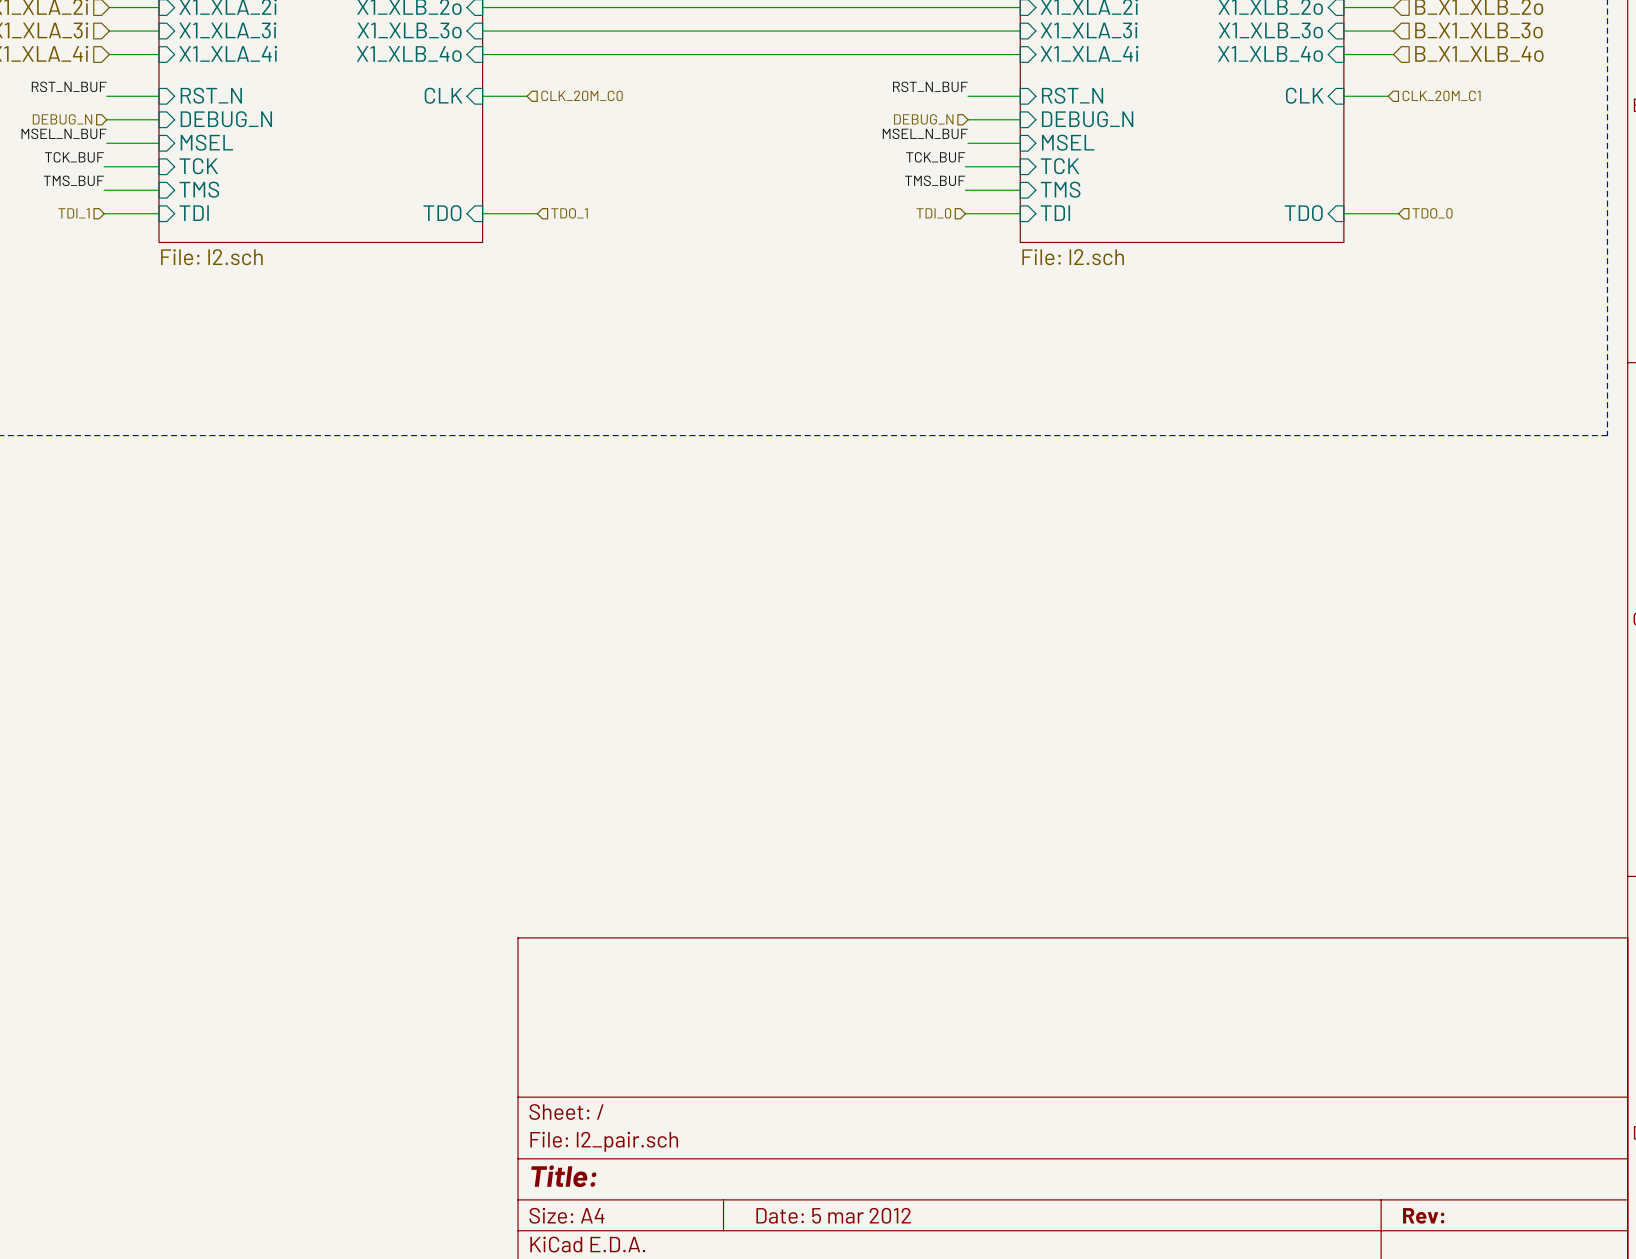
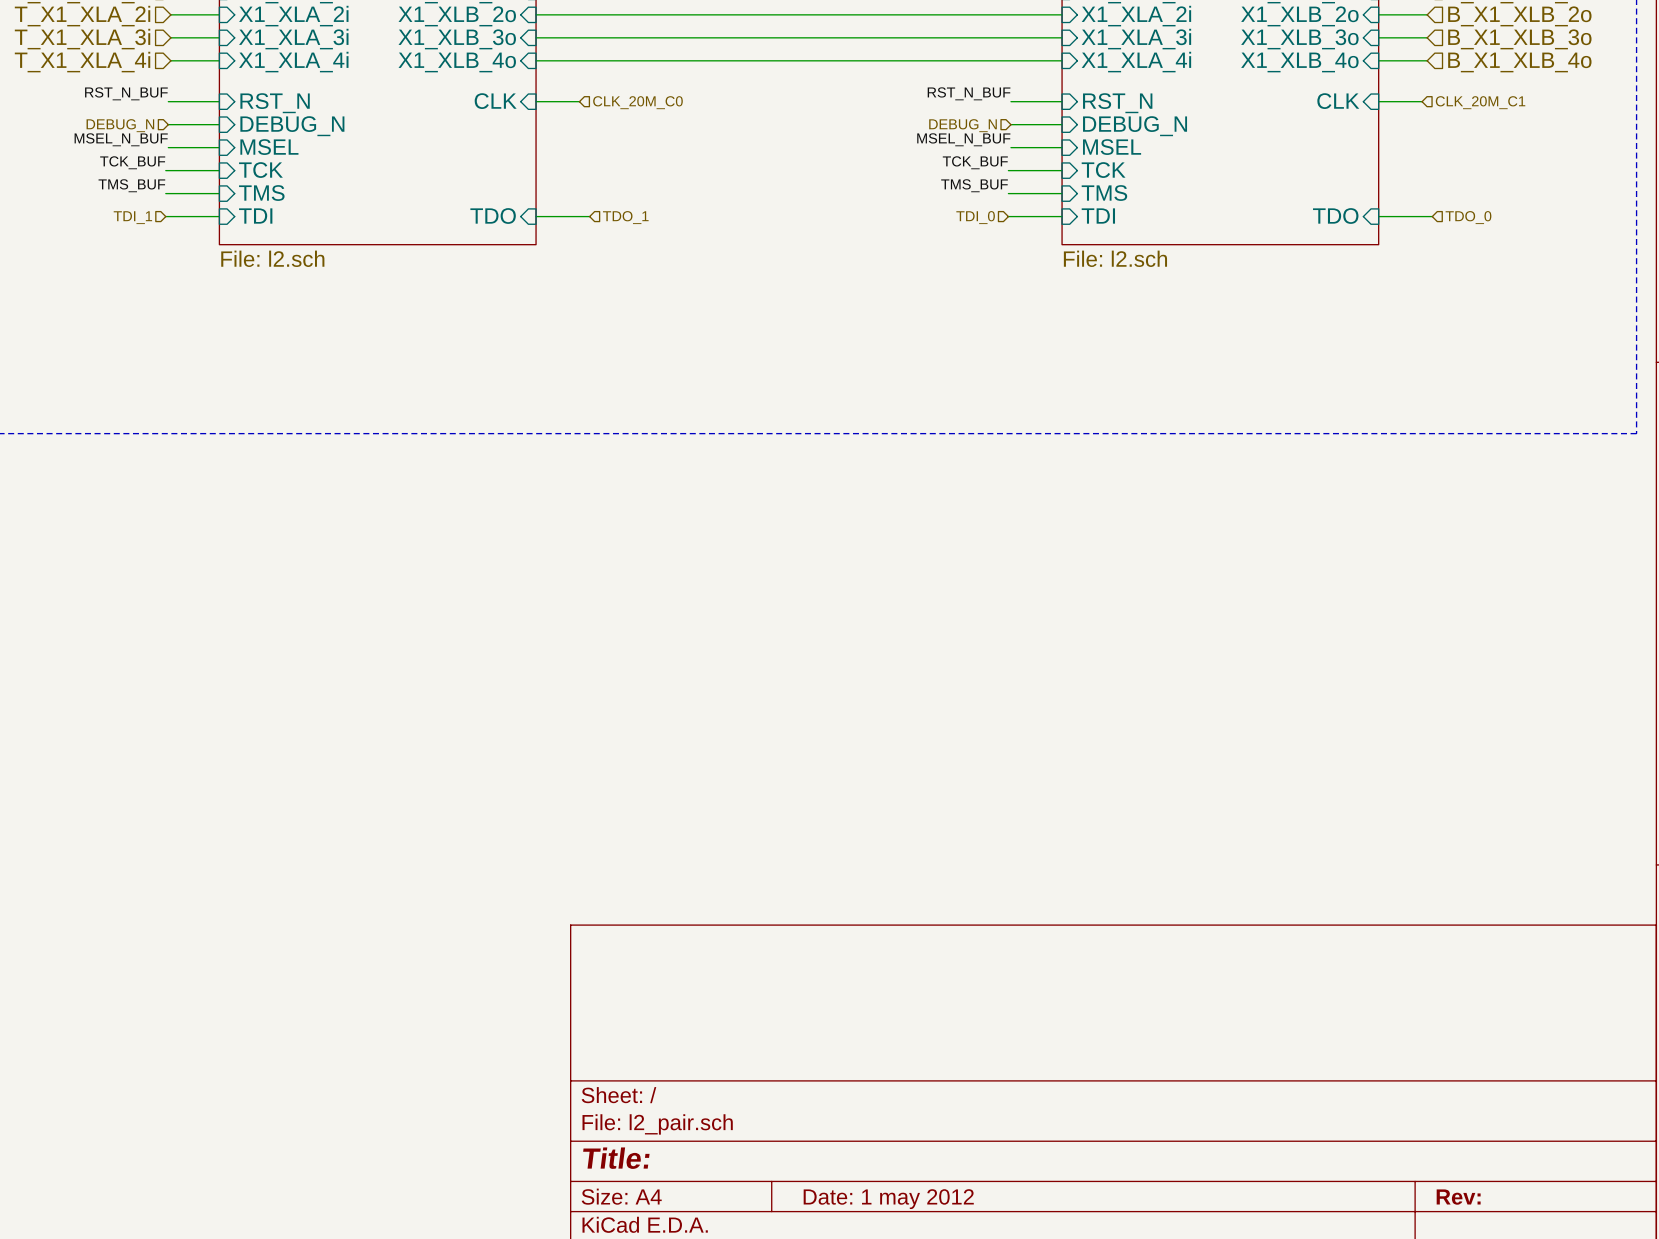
title block: Date: 5 mar 2012 (833, 1215) -> Date: 1 may 2012 (888, 1199)

